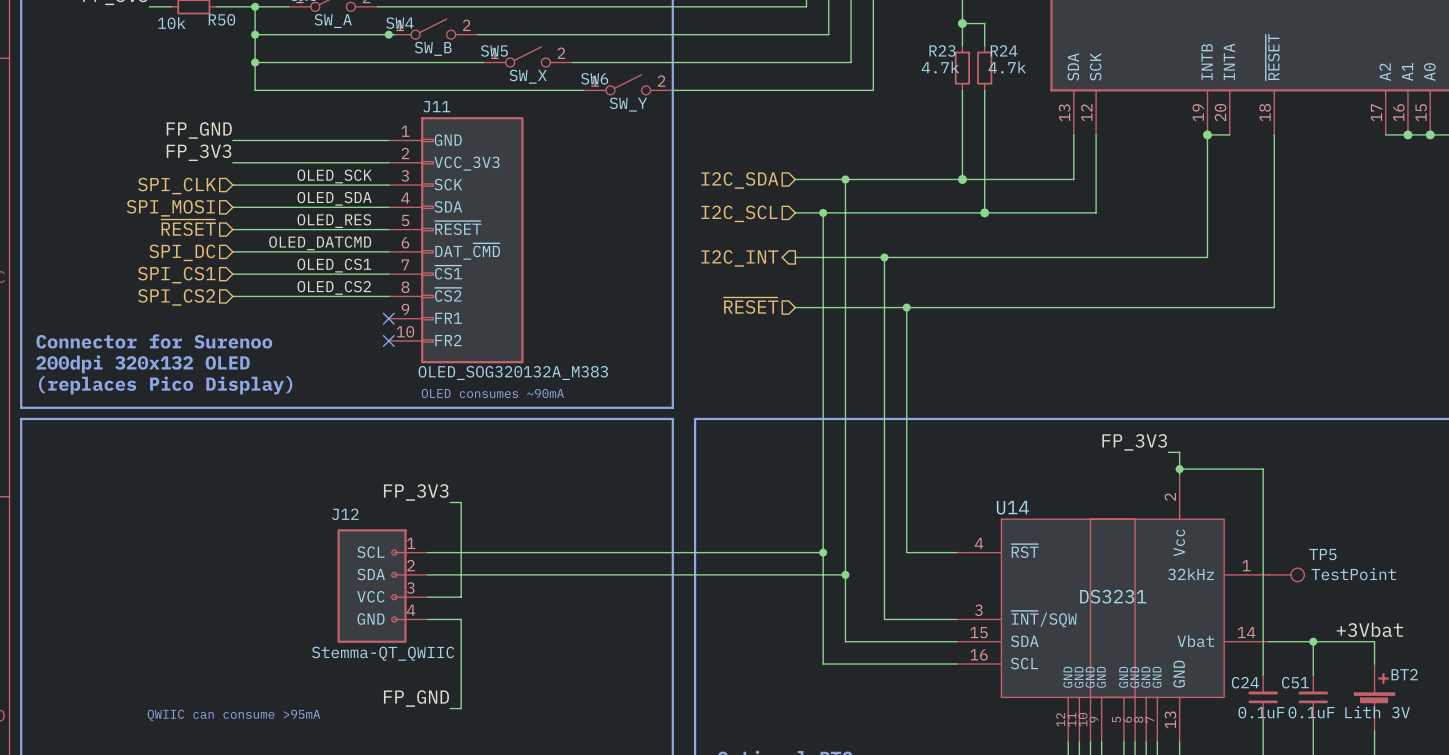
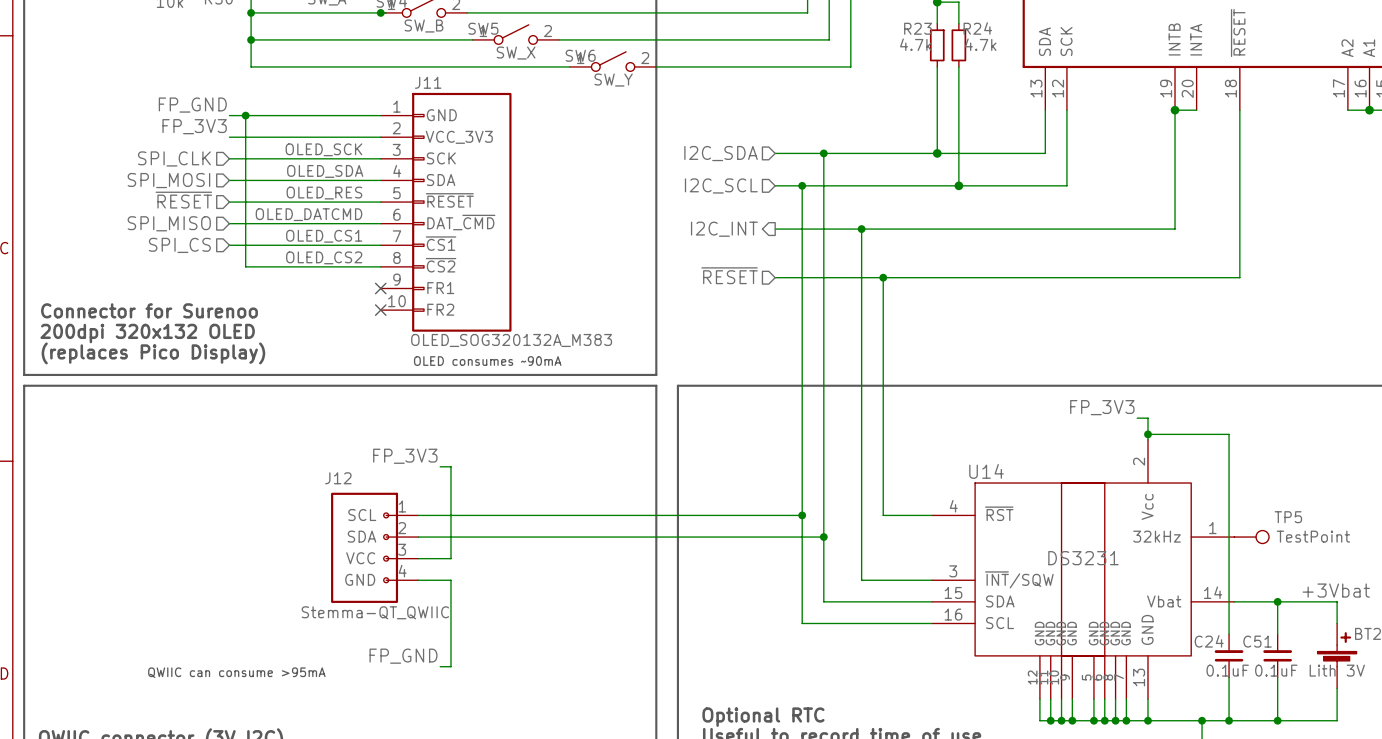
junction: none -> (245, 115)
hierarchical label: SPI_DC (182, 252) -> SPI_MISO (169, 223)
hierarchical label: SPI_CS1 (176, 275) -> SPI_CS (179, 245)
wire: (232, 296) (249, 296) -> (245, 115) (245, 266)
hierarchical label: SPI_CS2 (176, 297) -> none

